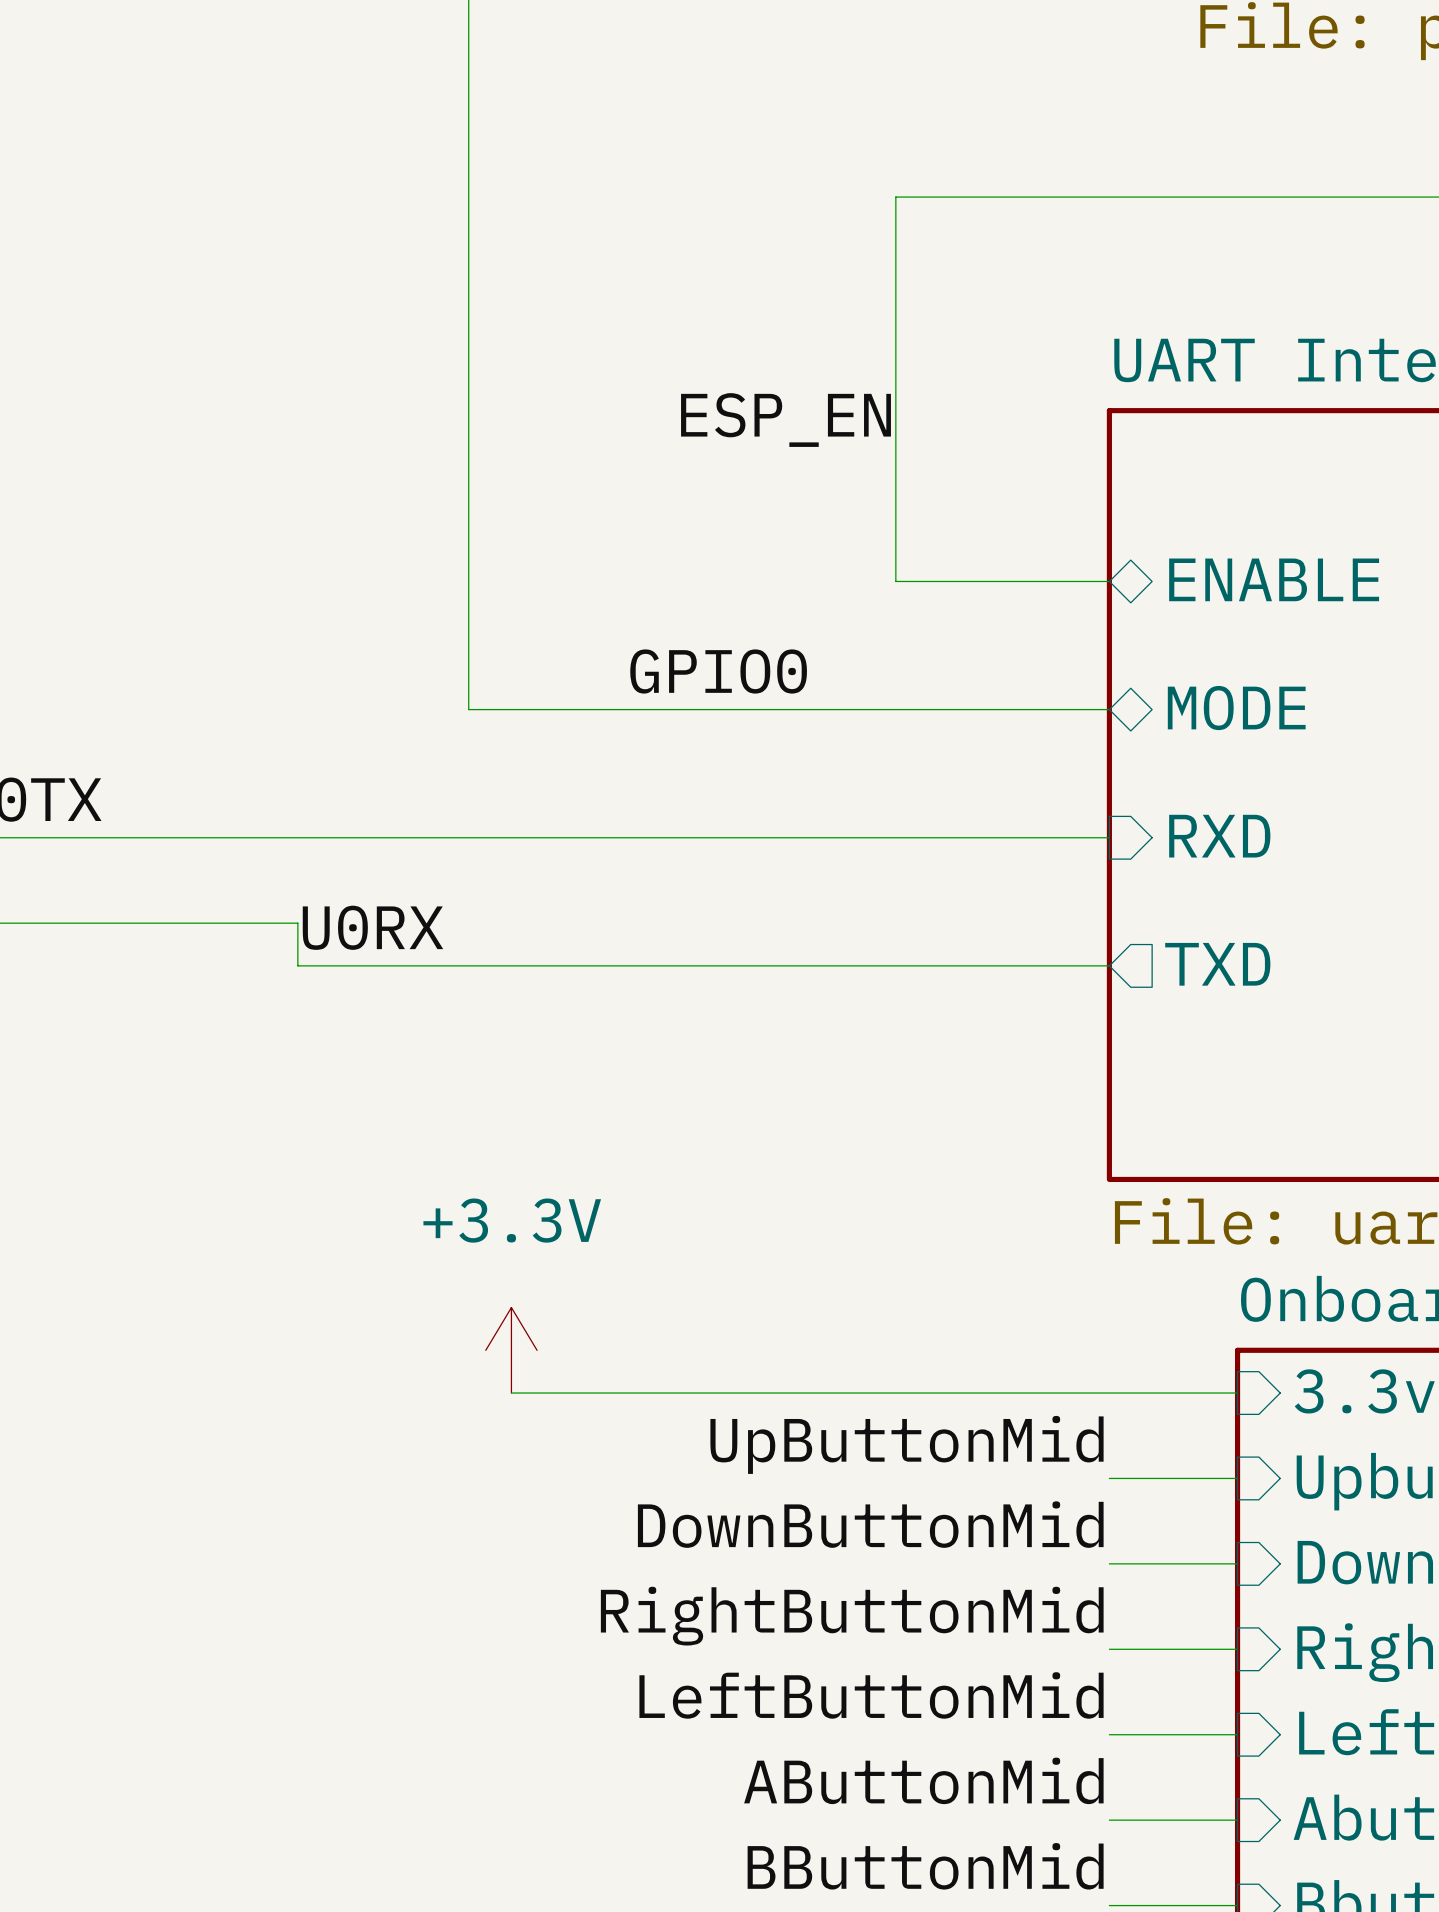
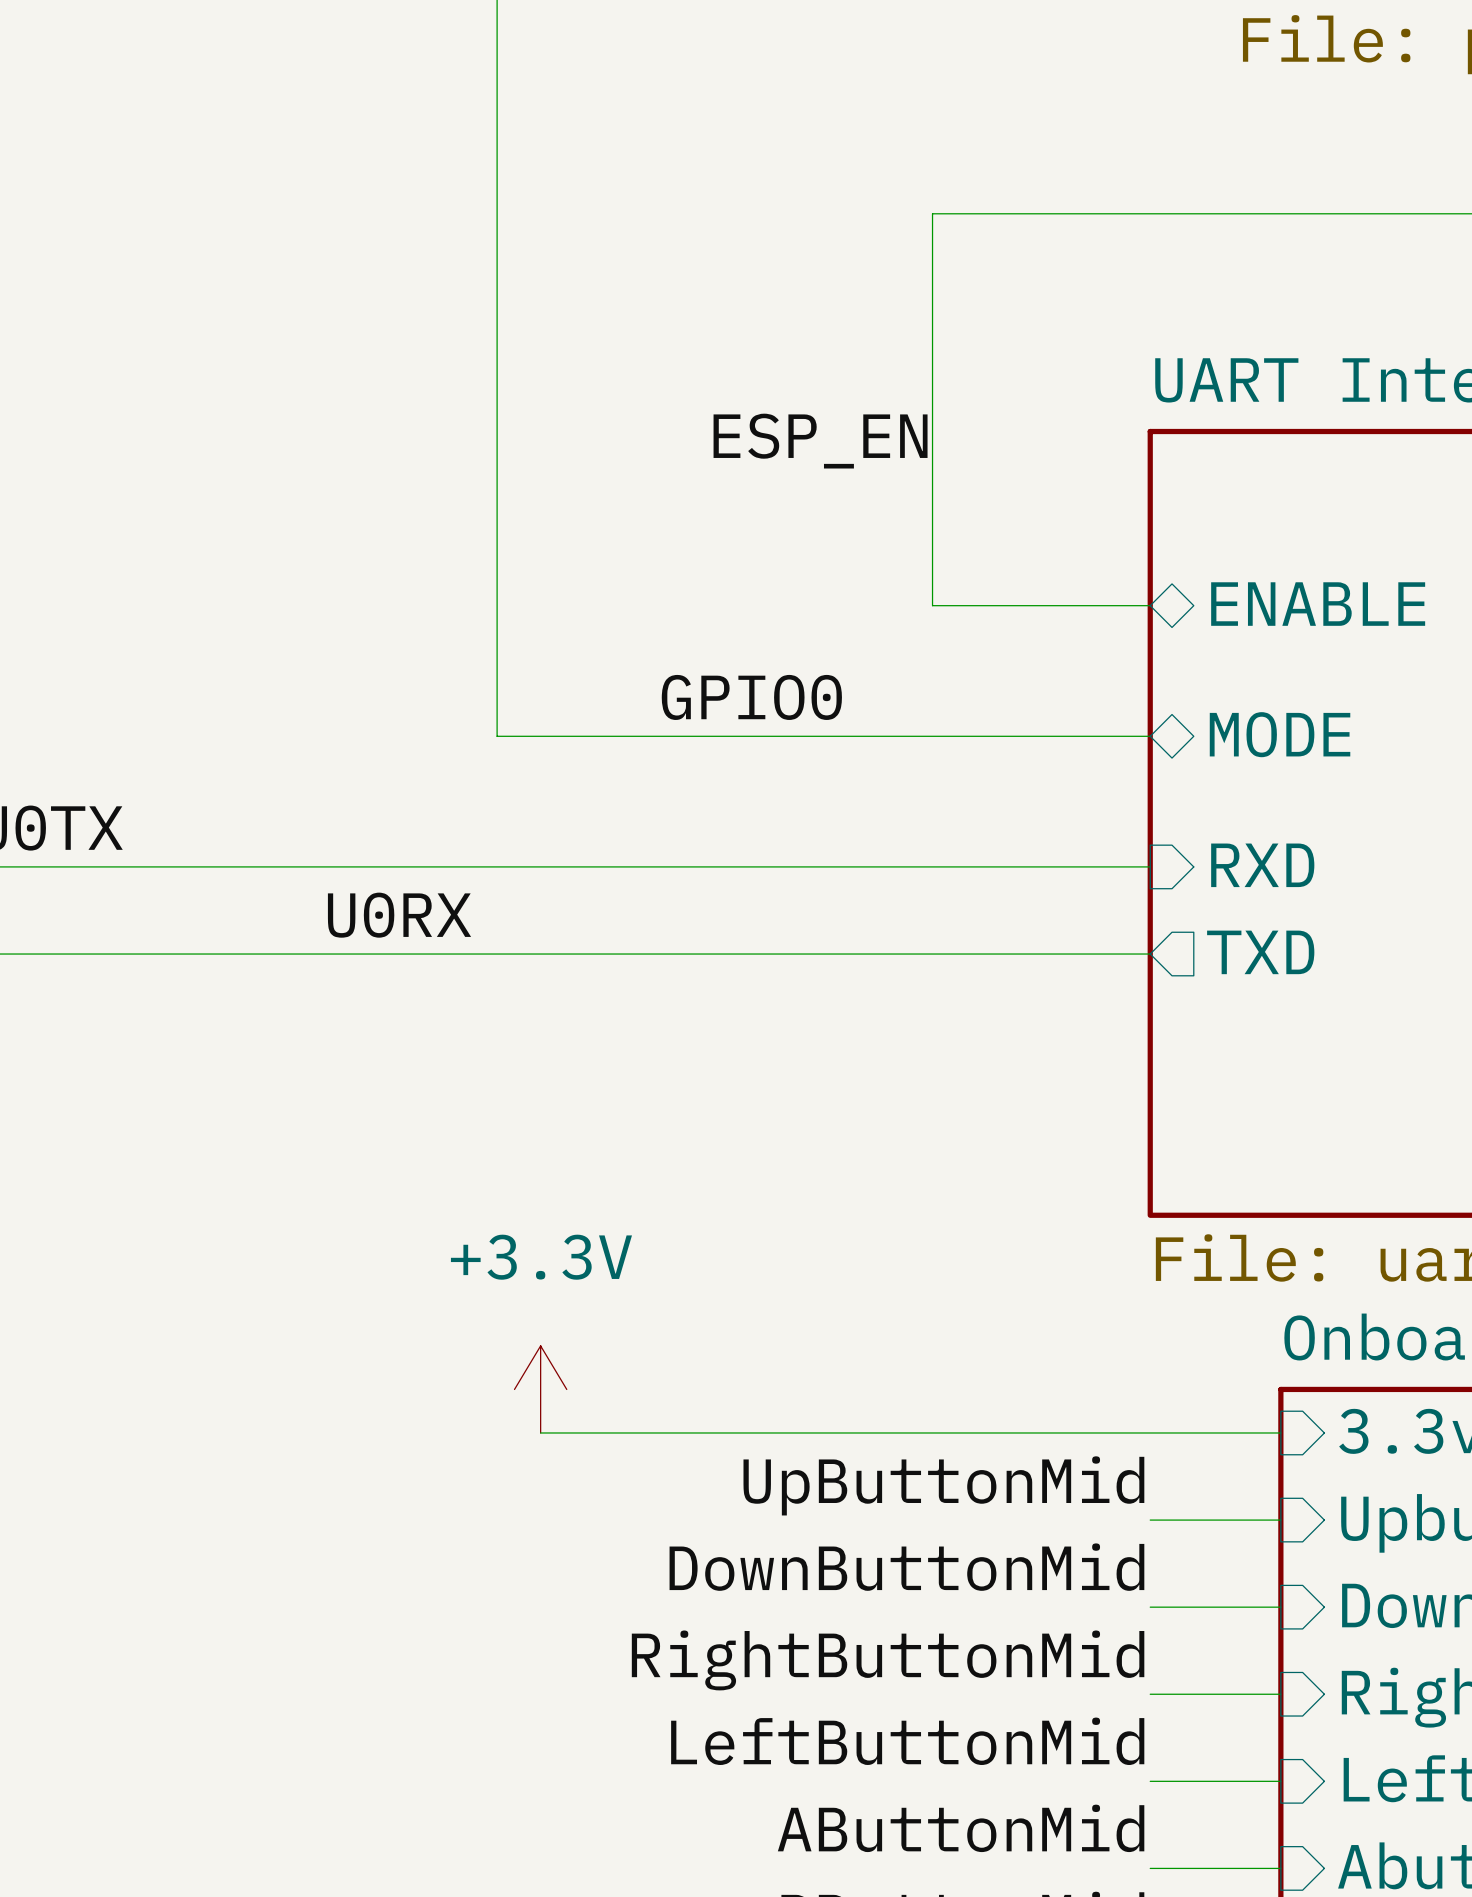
wire: (297, 923) (297, 965) (1109, 965) -> (322, 954) (1150, 954)
label position: U0RX (372, 927) -> U0RX (399, 915)
sheet pin position: TXD (1217, 964) -> TXD (1260, 952)

